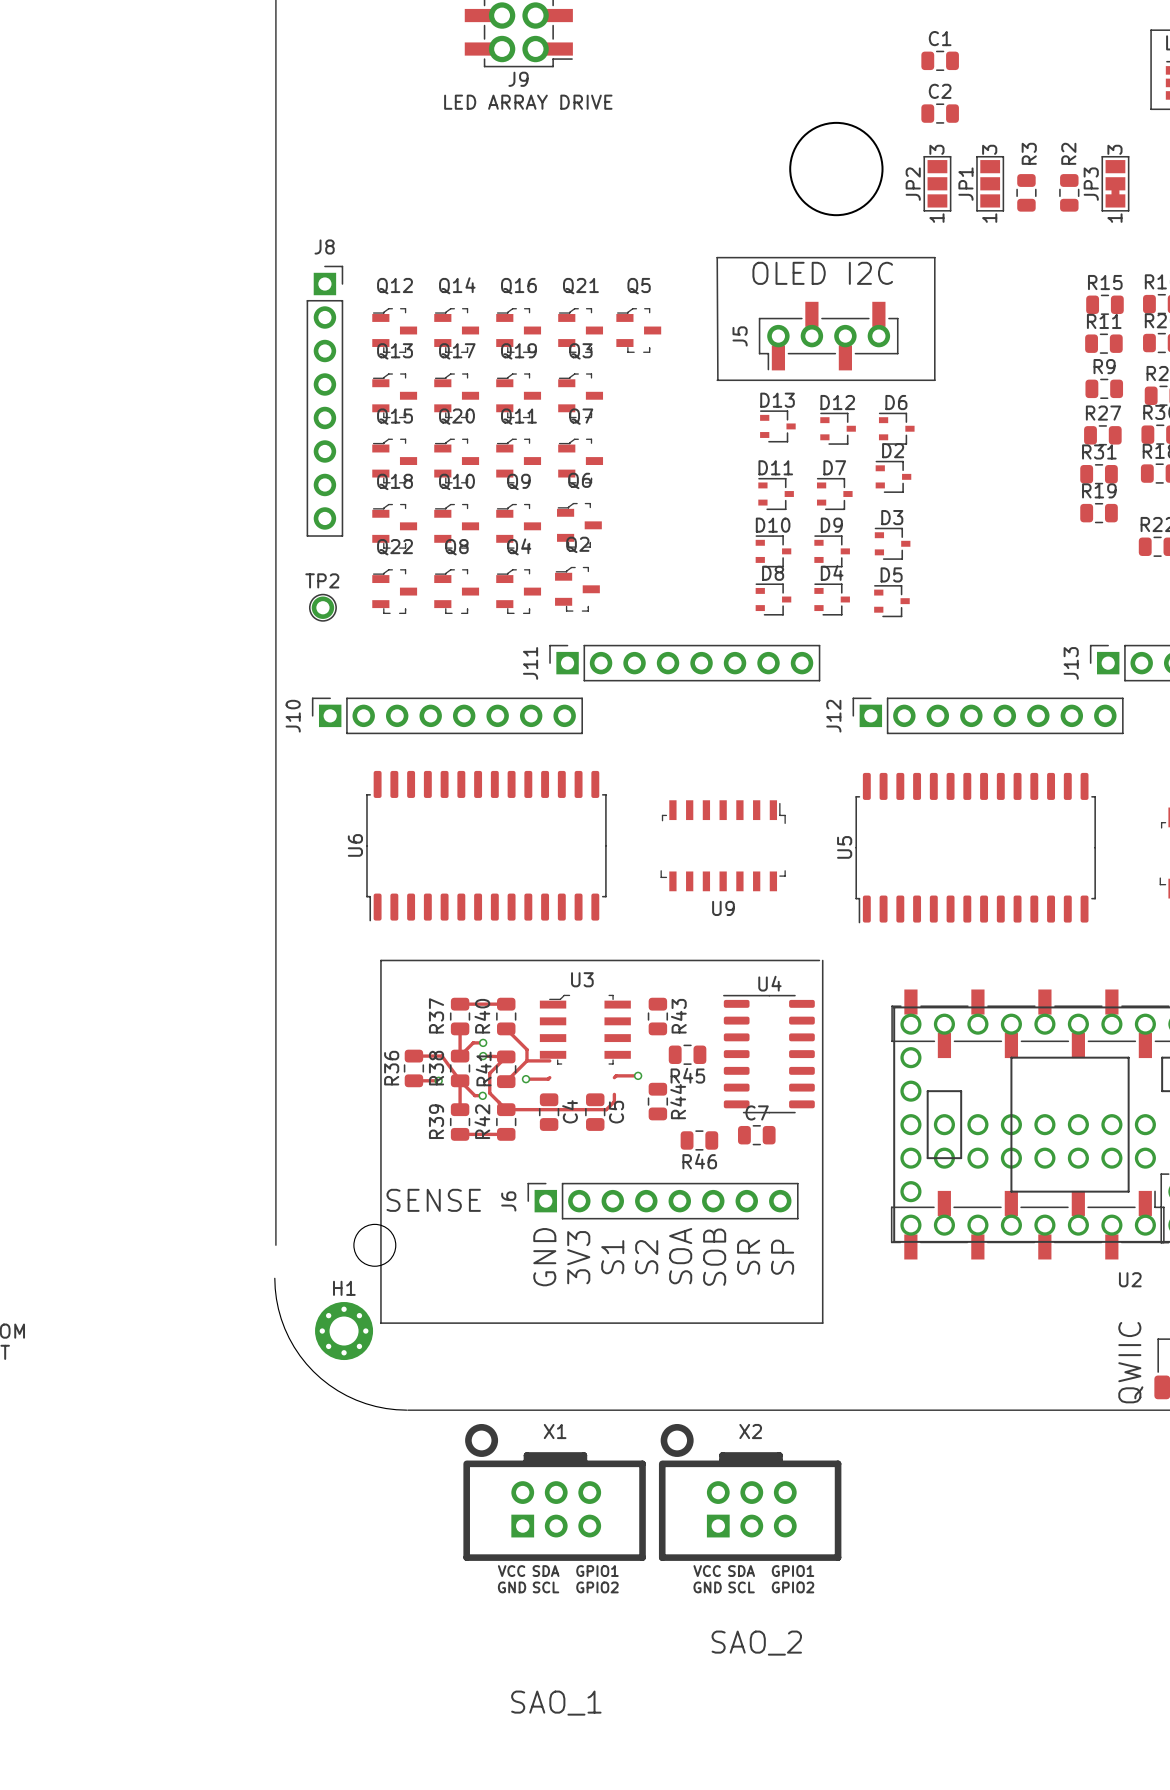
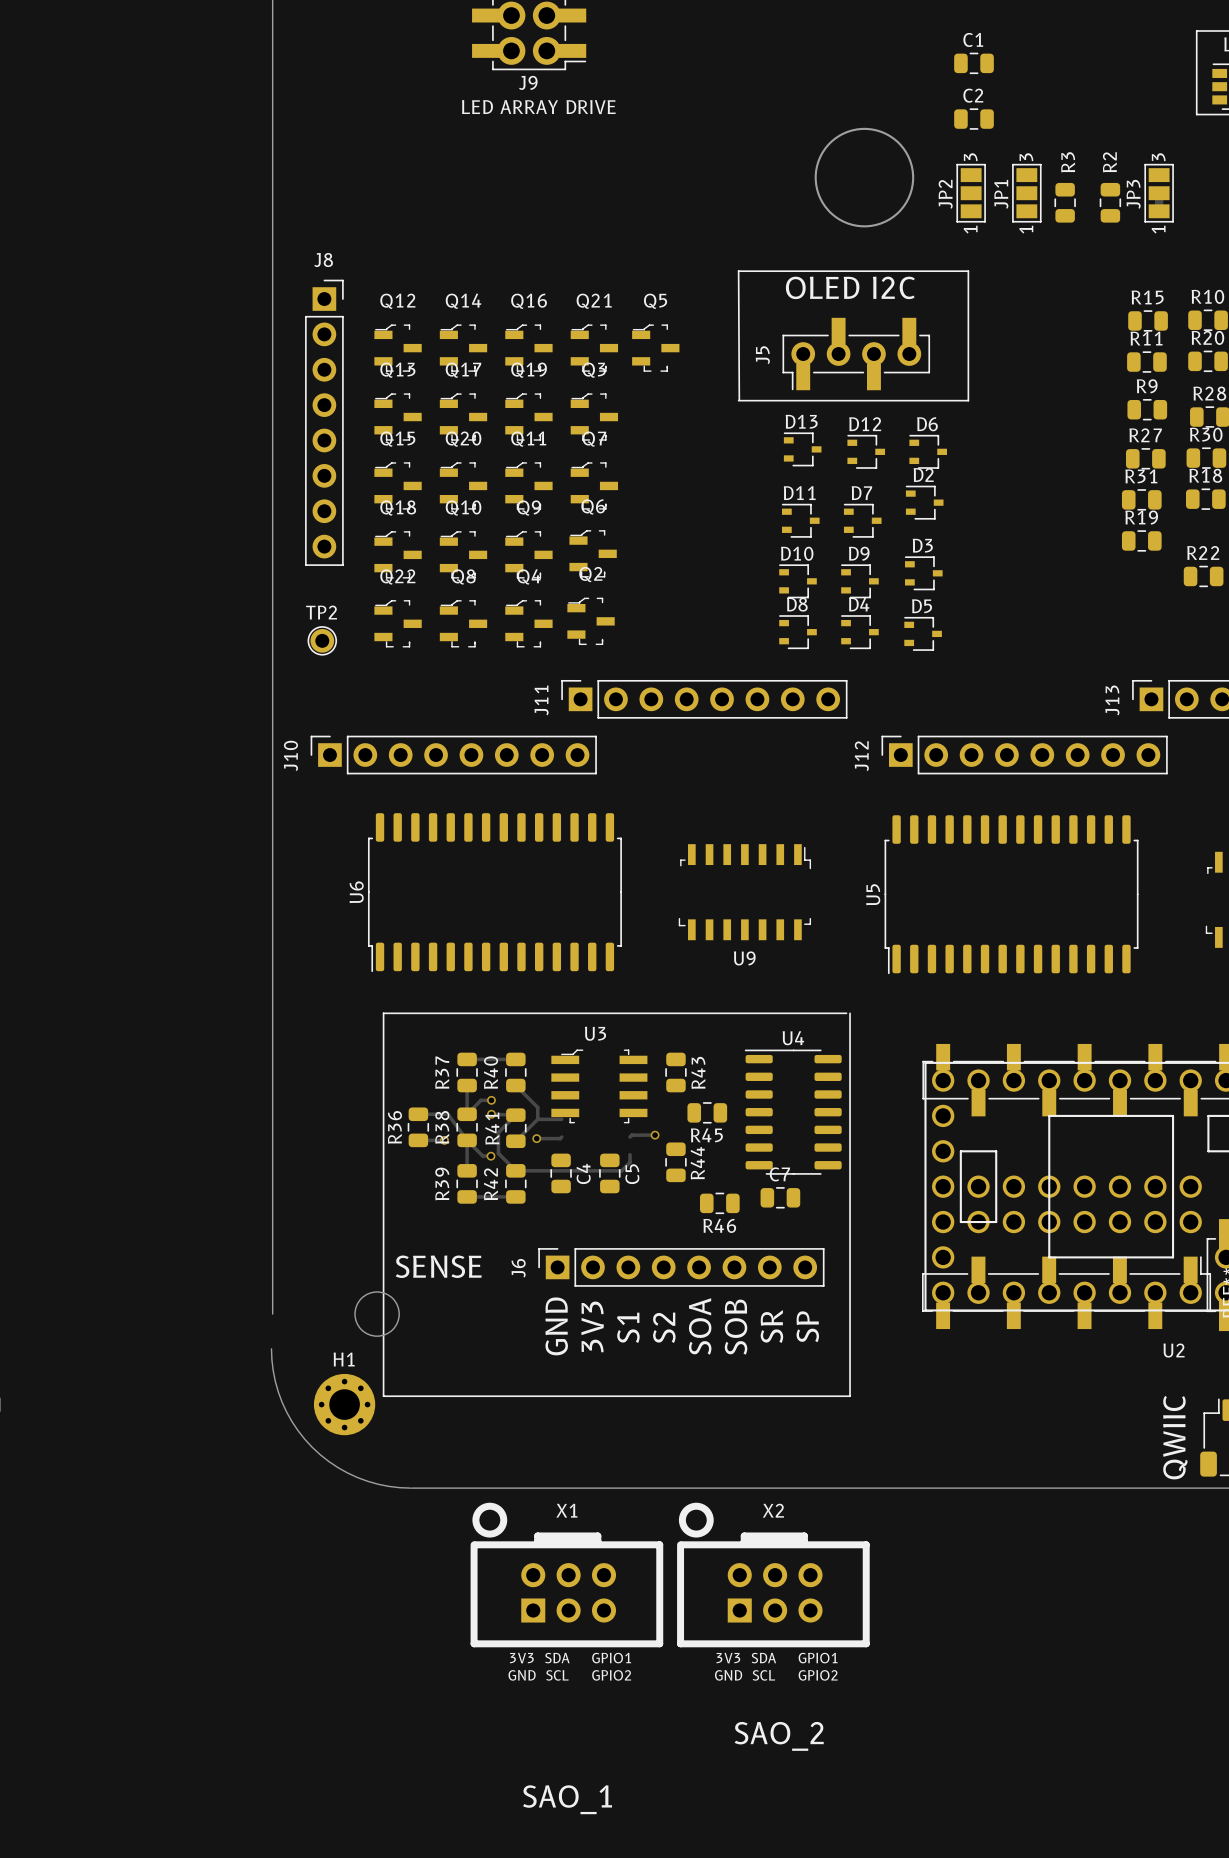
X1 text: VCC (511, 1571) -> 3V3 (521, 1658)
X2 text: VCC (707, 1571) -> 3V3 (728, 1658)

